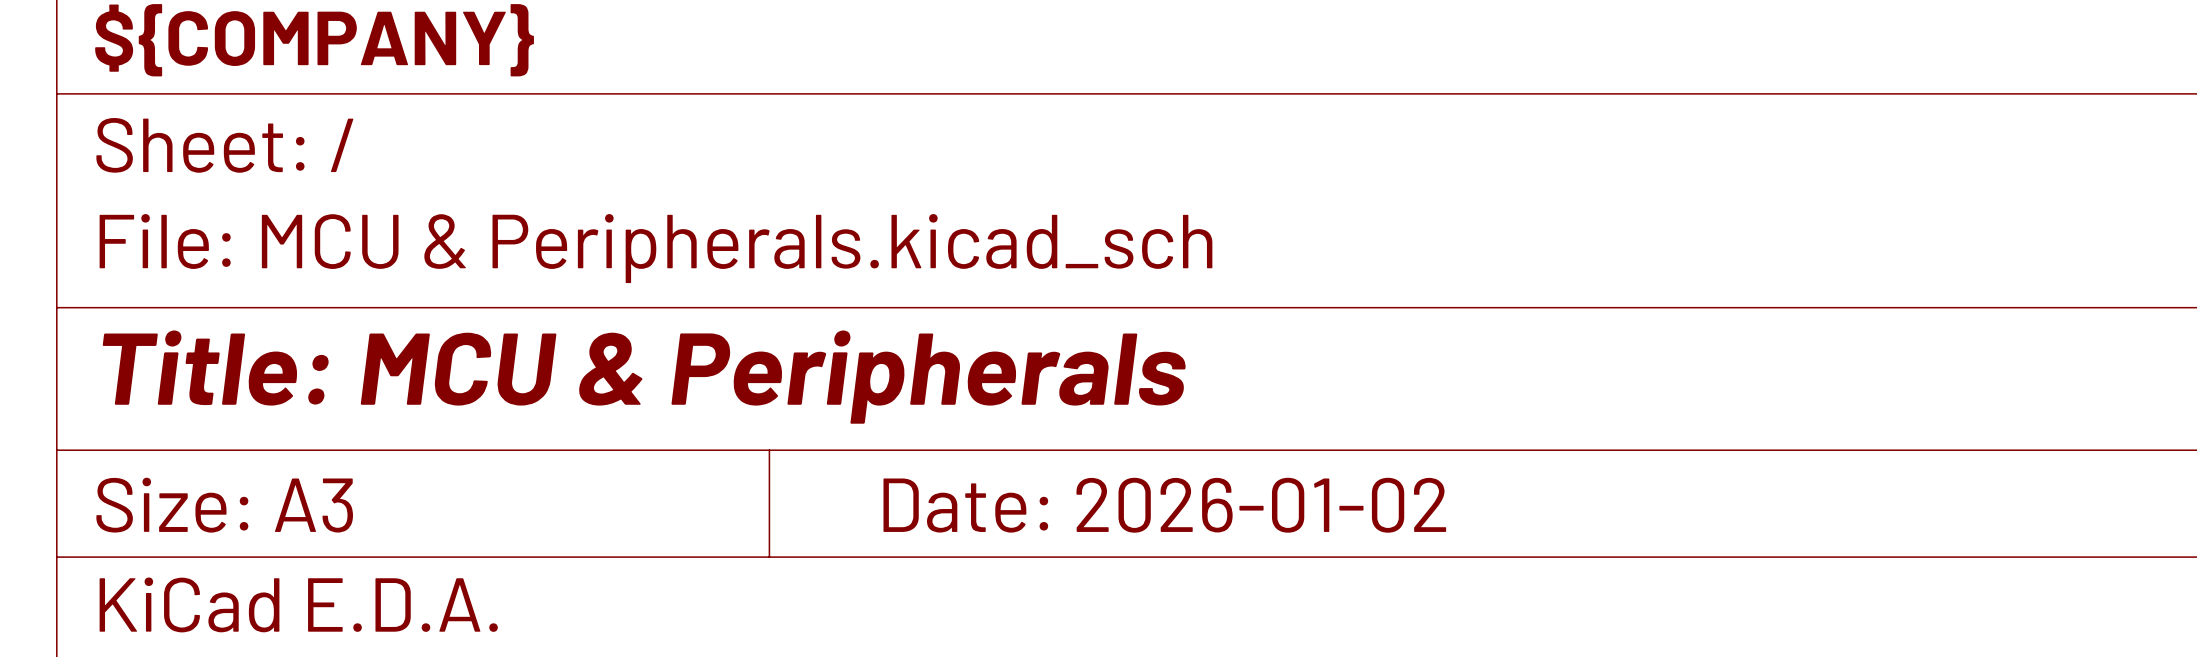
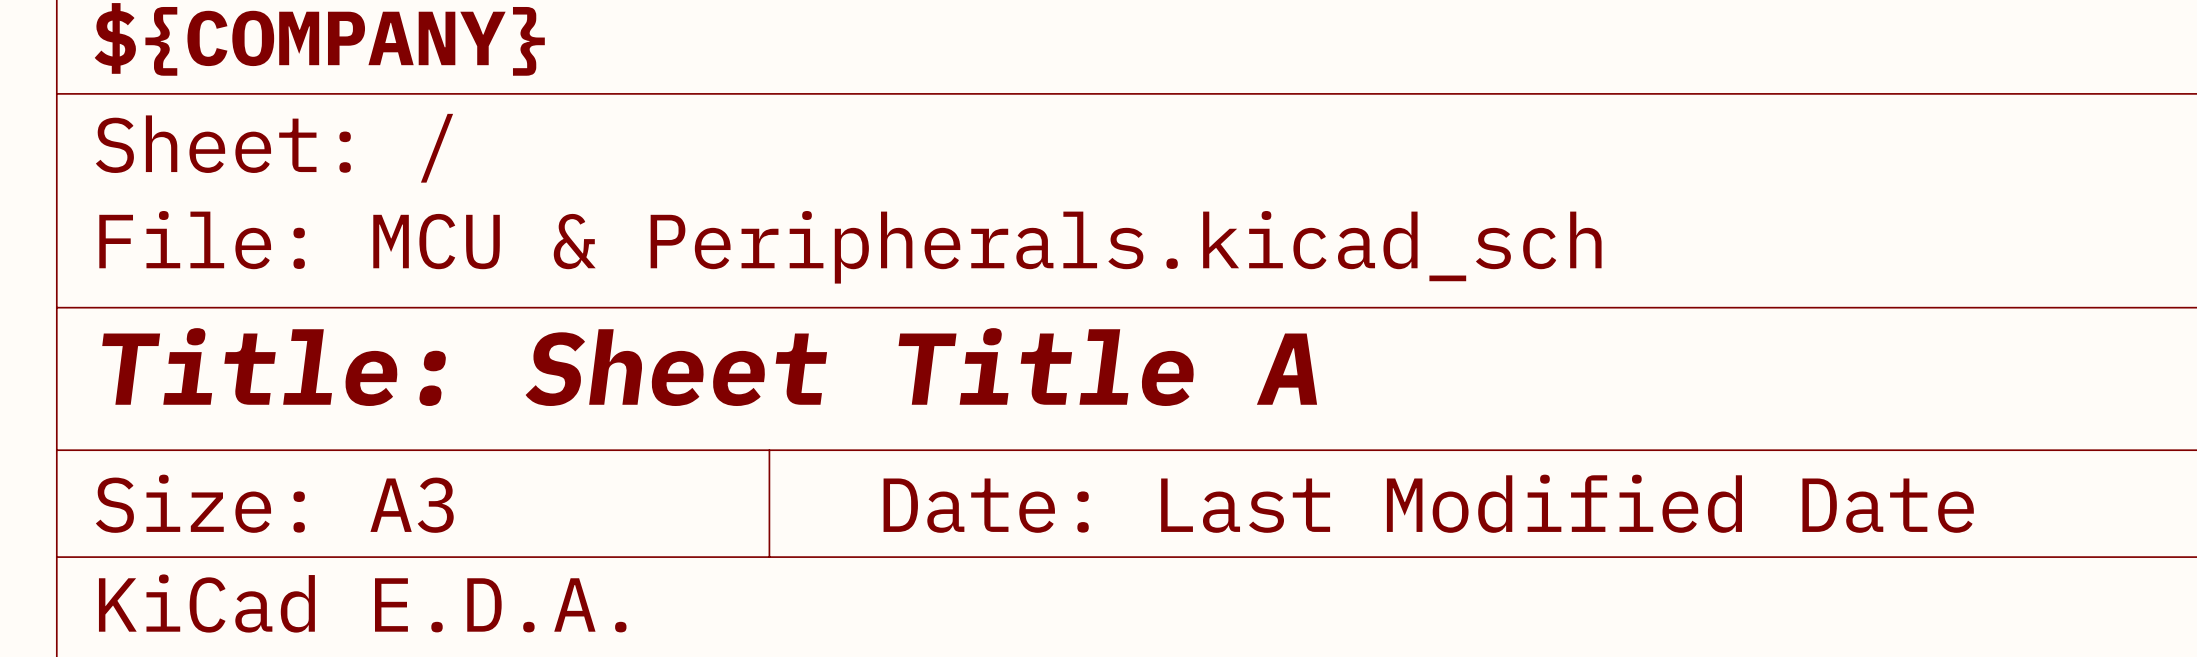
title block: Title: MCU & Peripherals (644, 377) -> Title: Sheet Title A (709, 367)
title block: Date: 2026-01-02 (1164, 505) -> Date: Last Modified Date (1428, 503)

